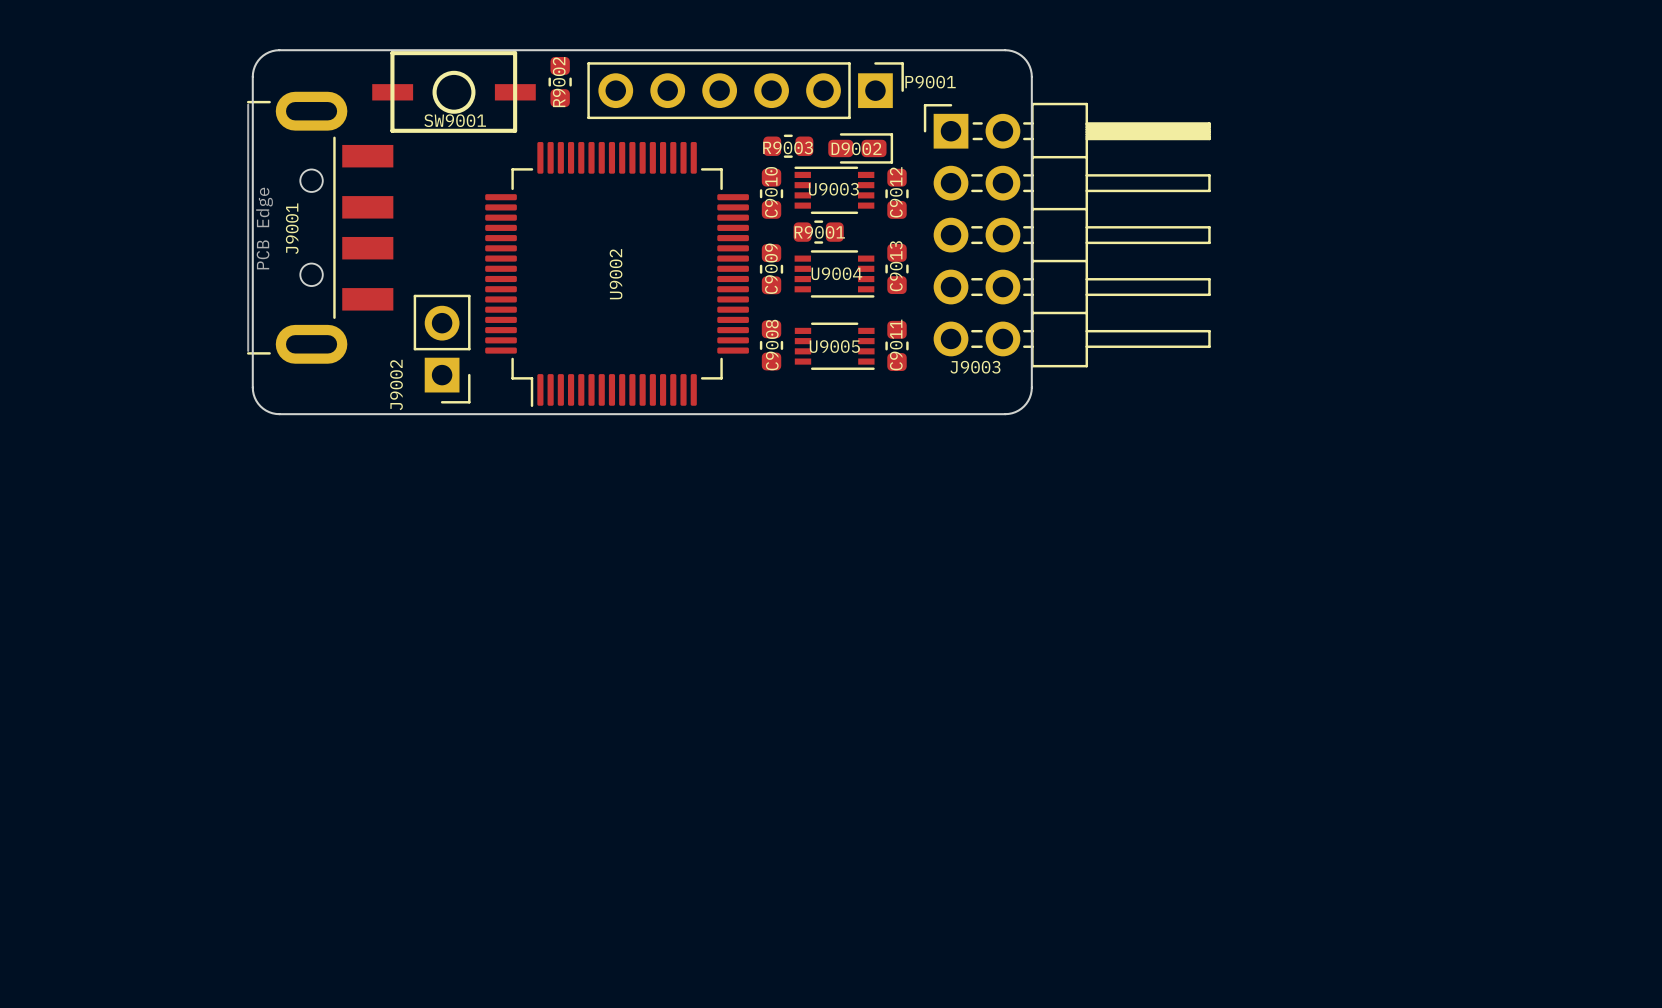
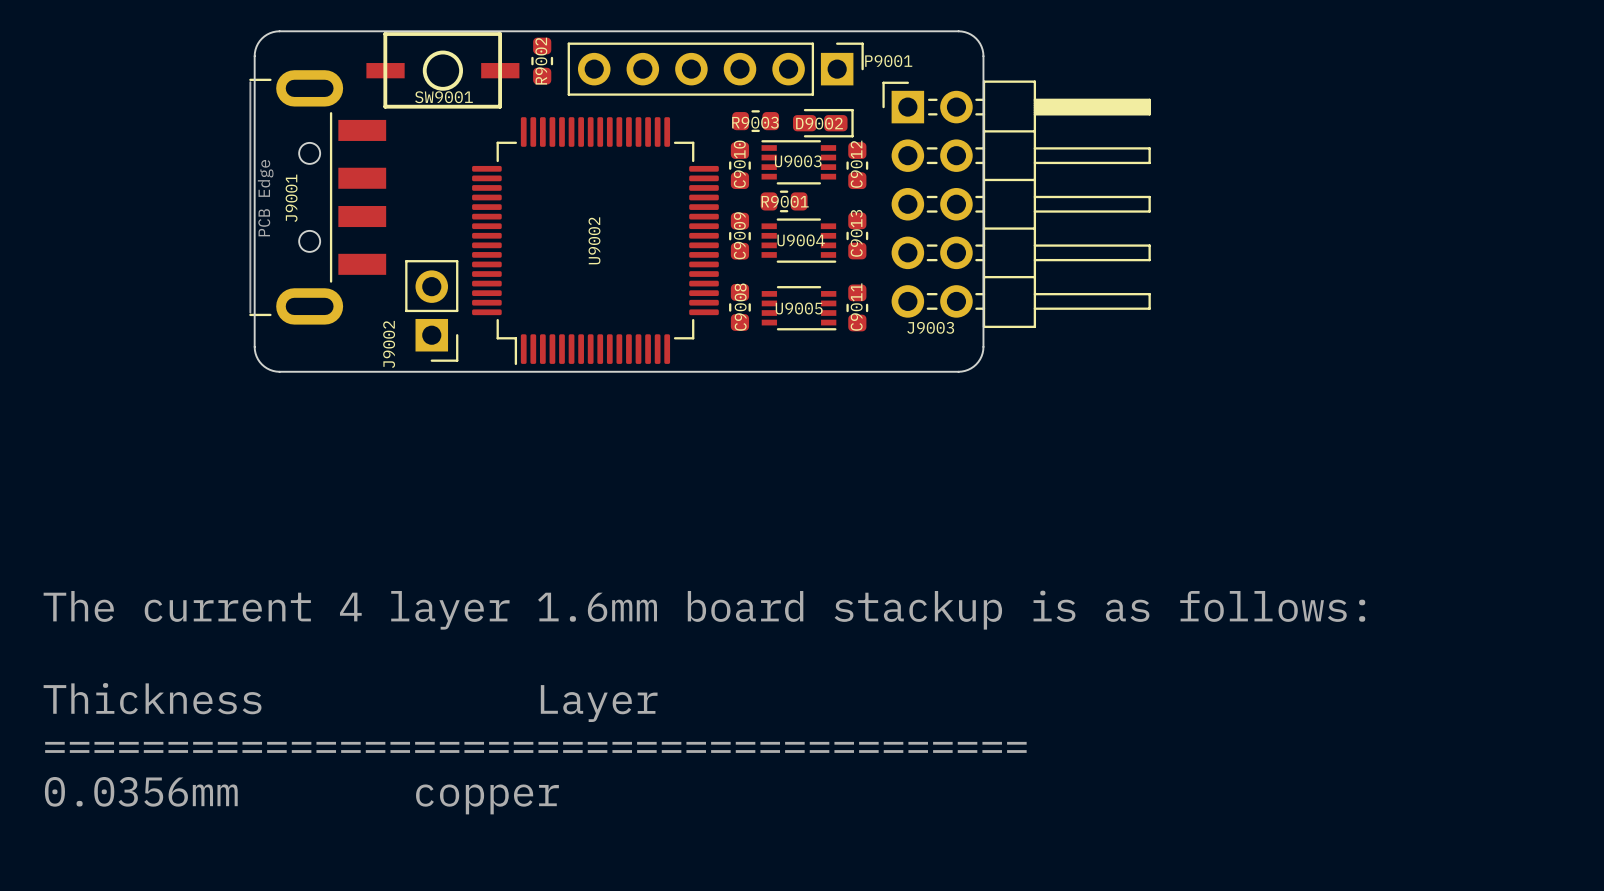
text: none -> The current 4 layer 1.6mm board stackup is as follows: (704, 610)
text: none -> Thickness Layer (350, 702)
text: none -> ======================================== (535, 747)
text: none -> 0.0356mm copper (301, 795)

